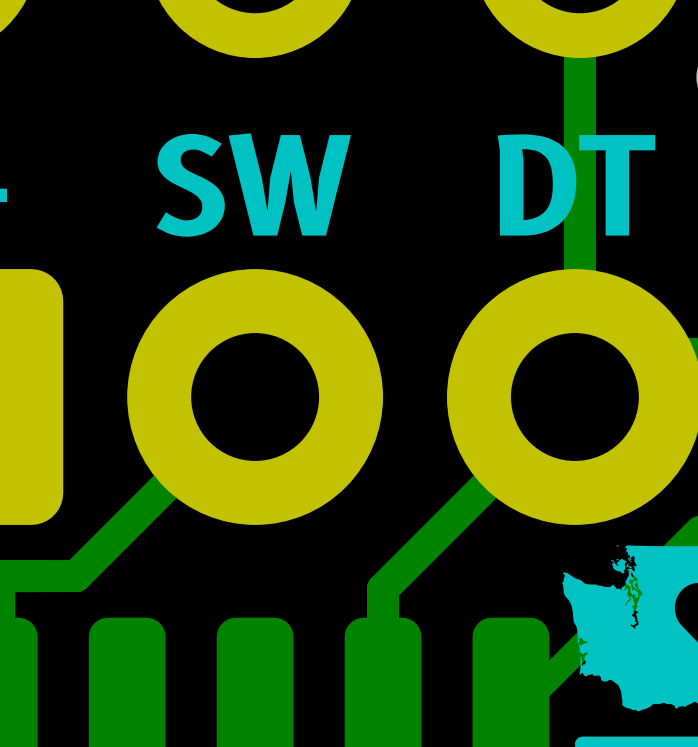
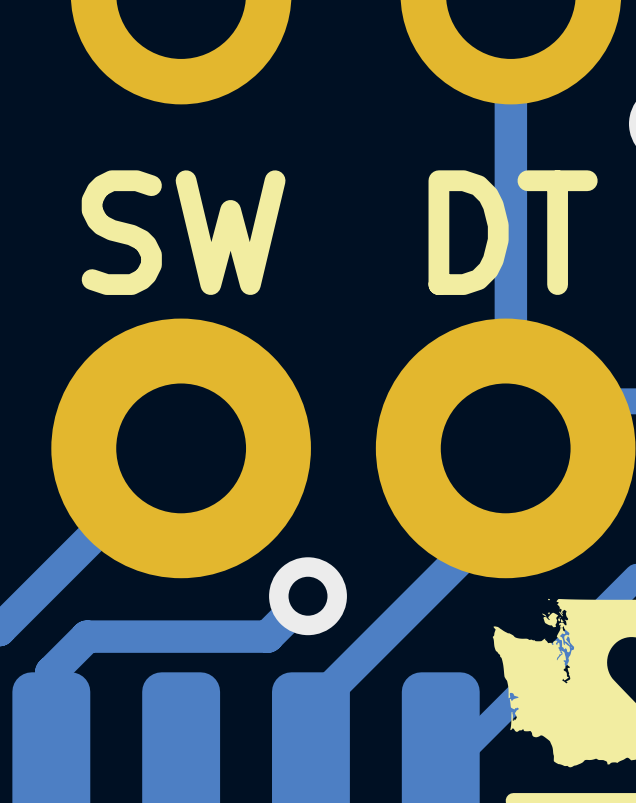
track: (574, 396) (383, 588) (383, 652) -> (505, 448) (505, 513) (310, 708)
track: none -> (308, 596) (267, 636) (87, 636) (51, 672) (51, 772)
via: none -> (308, 596)

